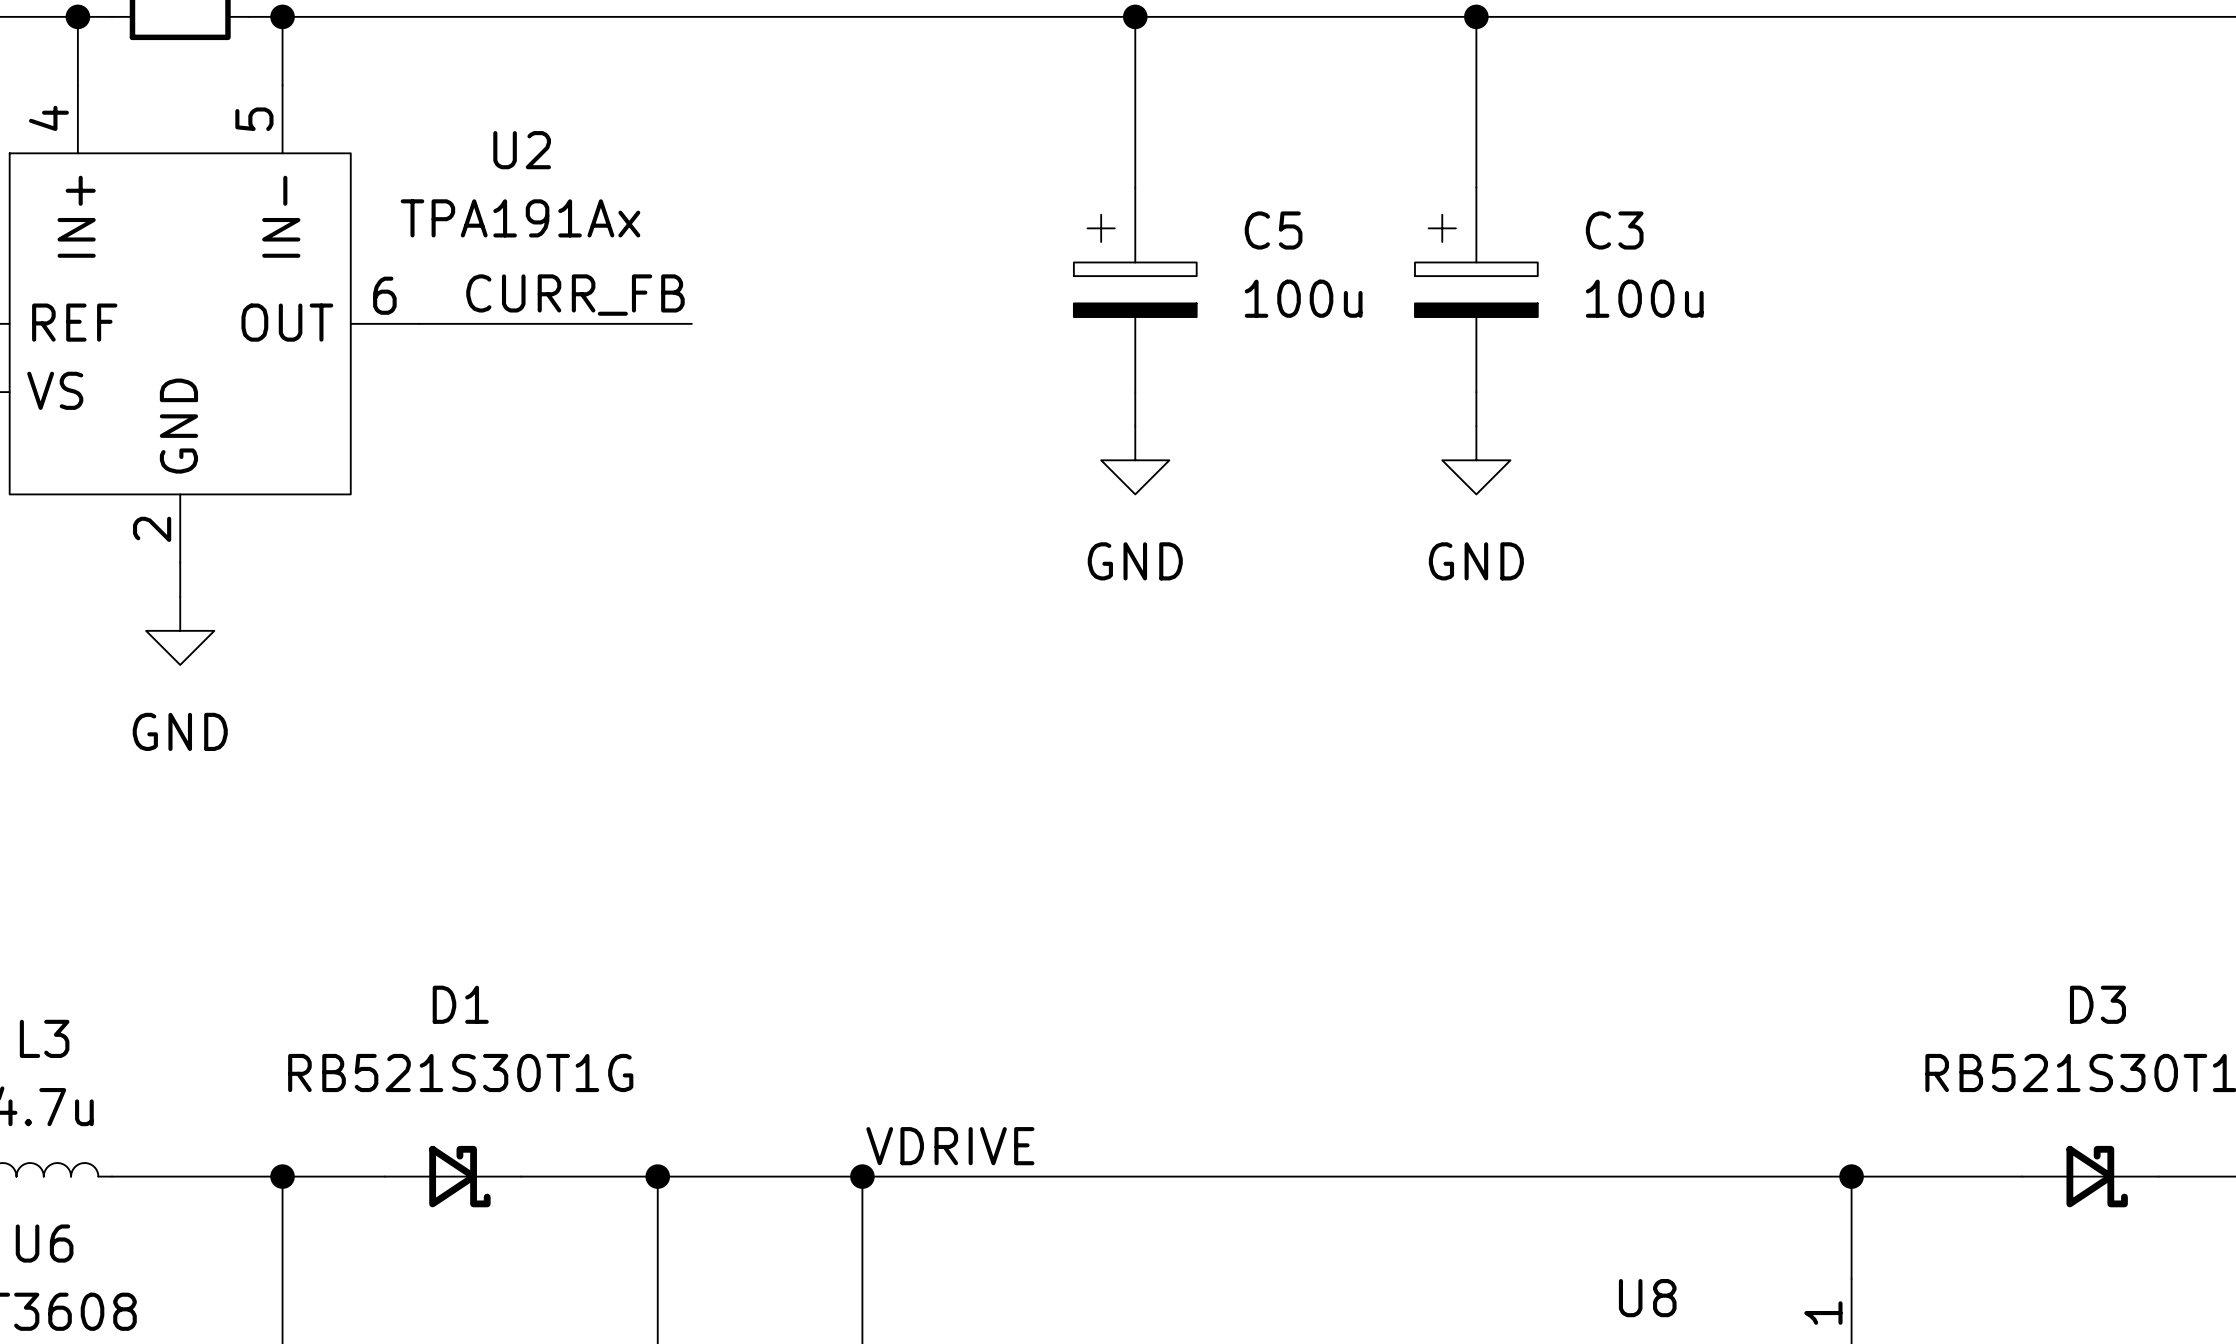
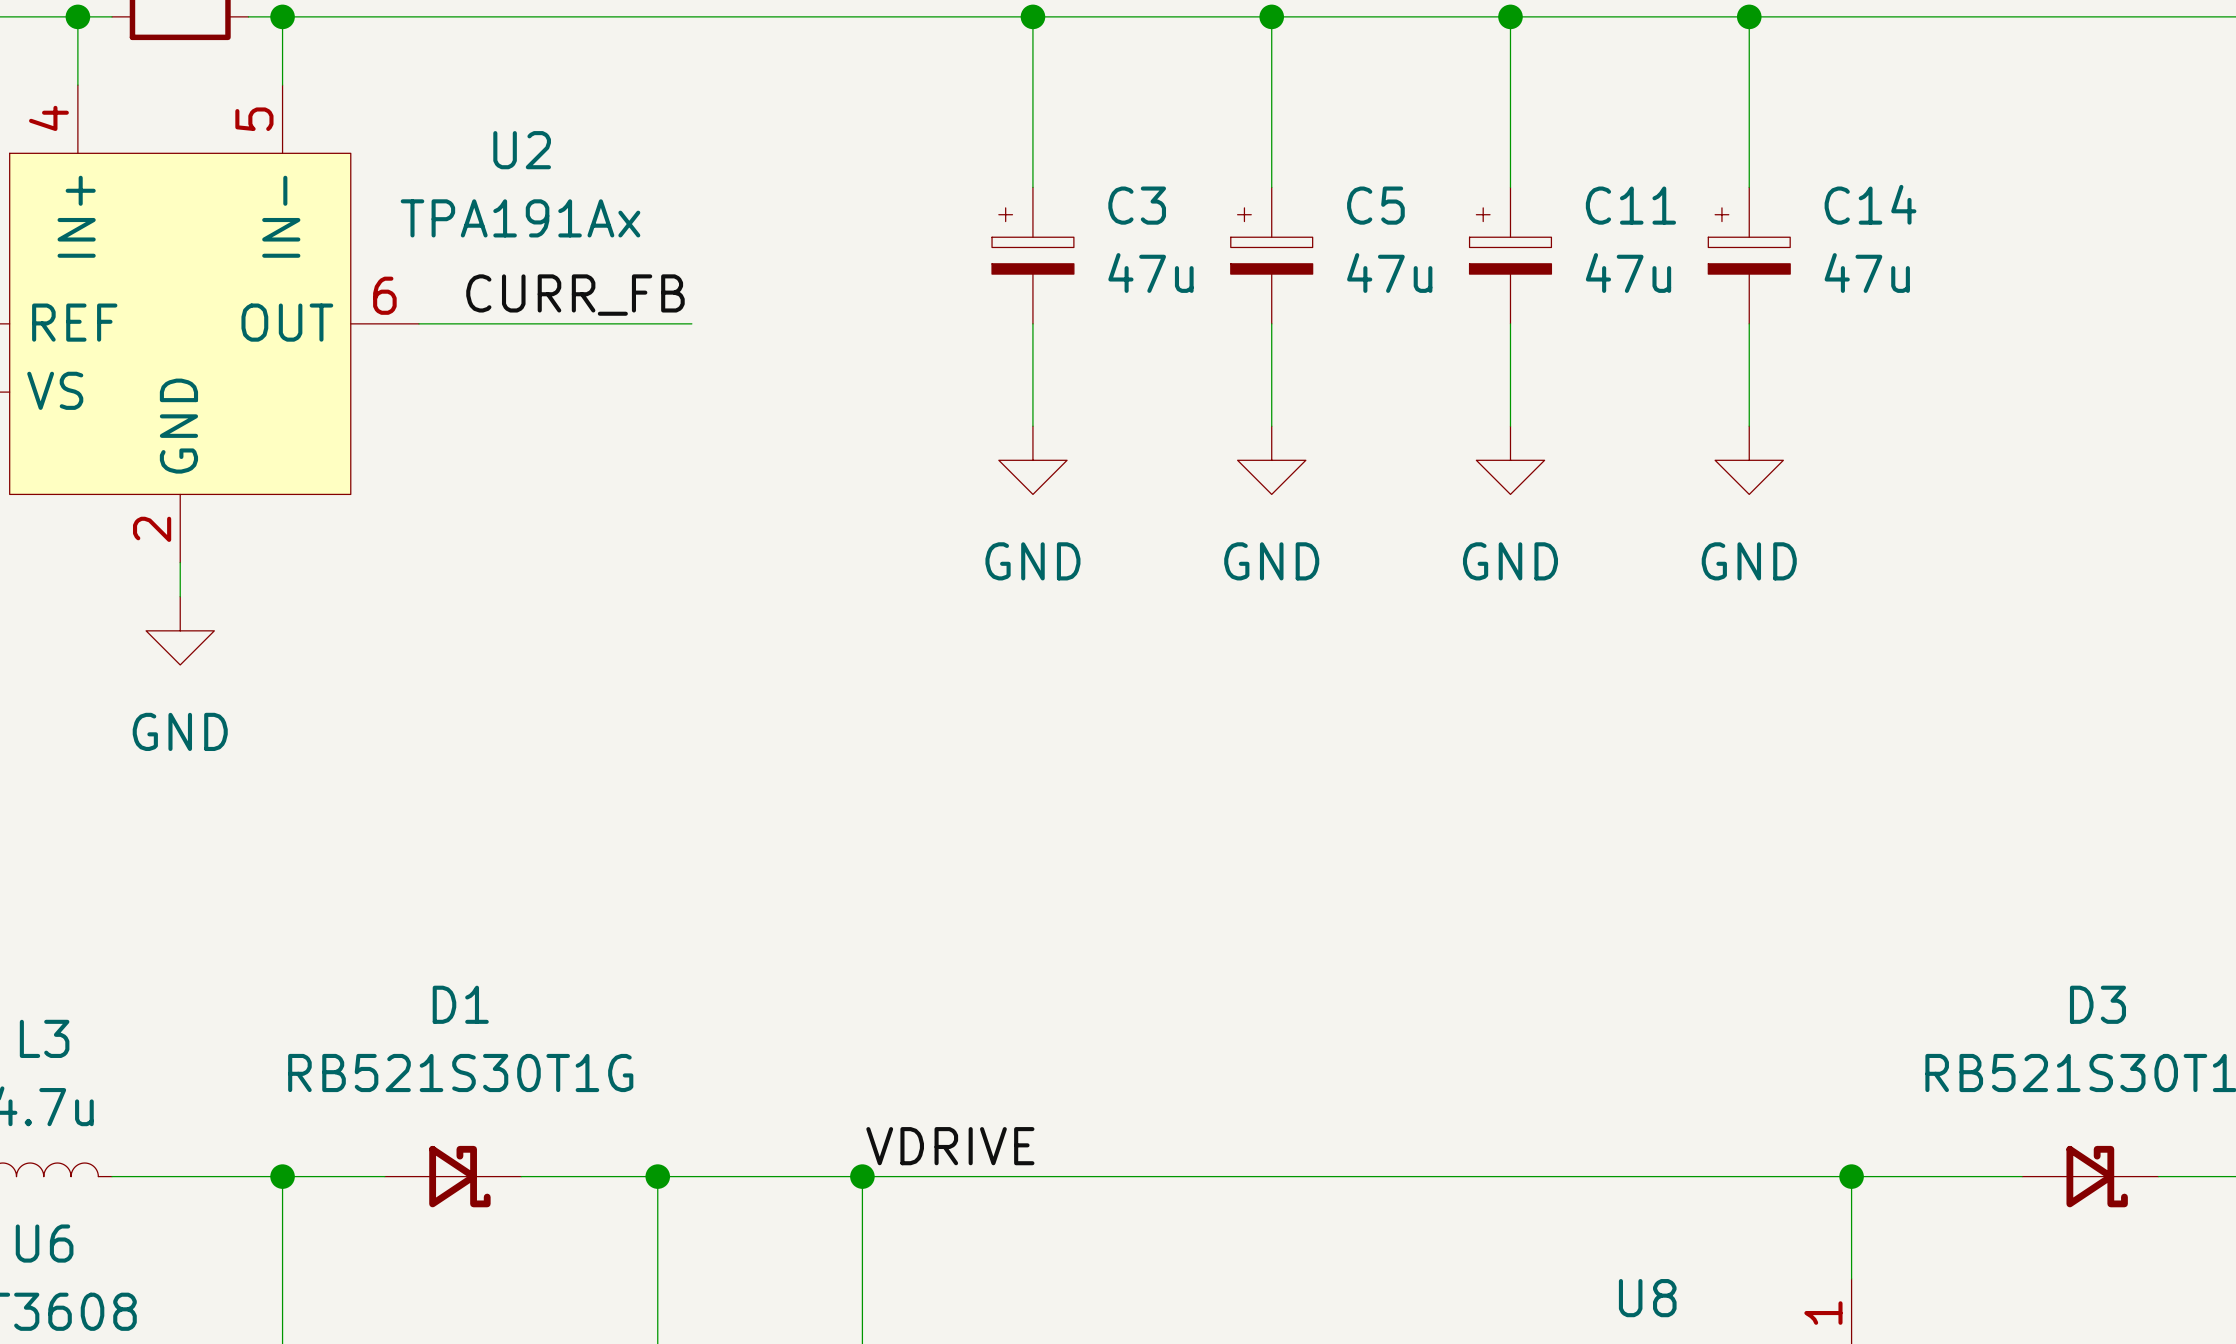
junction: none -> (1032, 16)
wire: (1135, 16) (1135, 187) -> (1032, 16) (1032, 187)
junction: (1135, 16) -> none
wire: none -> (1271, 16) (1271, 187)
junction: none -> (1271, 16)
wire: (1476, 16) (1476, 187) -> (1510, 16) (1510, 187)
junction position: (1476, 16) -> (1510, 16)
wire: none -> (1749, 16) (1749, 187)
junction: none -> (1749, 16)
C5 symbol: [1073, 187, 1197, 393] -> [1230, 187, 1313, 324]
C3 symbol: [1414, 187, 1538, 393] -> [992, 187, 1074, 324]
C11: none -> 47u (1510, 255)
C14: none -> 47u (1749, 255)
C5 value: 100u (1303, 298) -> 47u (1389, 273)
C3 value: 100u (1644, 298) -> 47u (1150, 273)
wire: none -> (1032, 323) (1032, 426)
wire: none -> (1271, 323) (1271, 426)
wire: none -> (1510, 323) (1510, 426)
wire: none -> (1749, 323) (1749, 426)
wire: (1135, 392) (1135, 426) -> none
wire: (1476, 392) (1476, 426) -> none
power symbol: none -> GND (1032, 460)
power symbol: GND (1135, 460) -> none
power symbol: none -> GND (1271, 460)
power symbol position: GND (1476, 460) -> GND (1510, 460)
power symbol: none -> GND (1749, 460)

